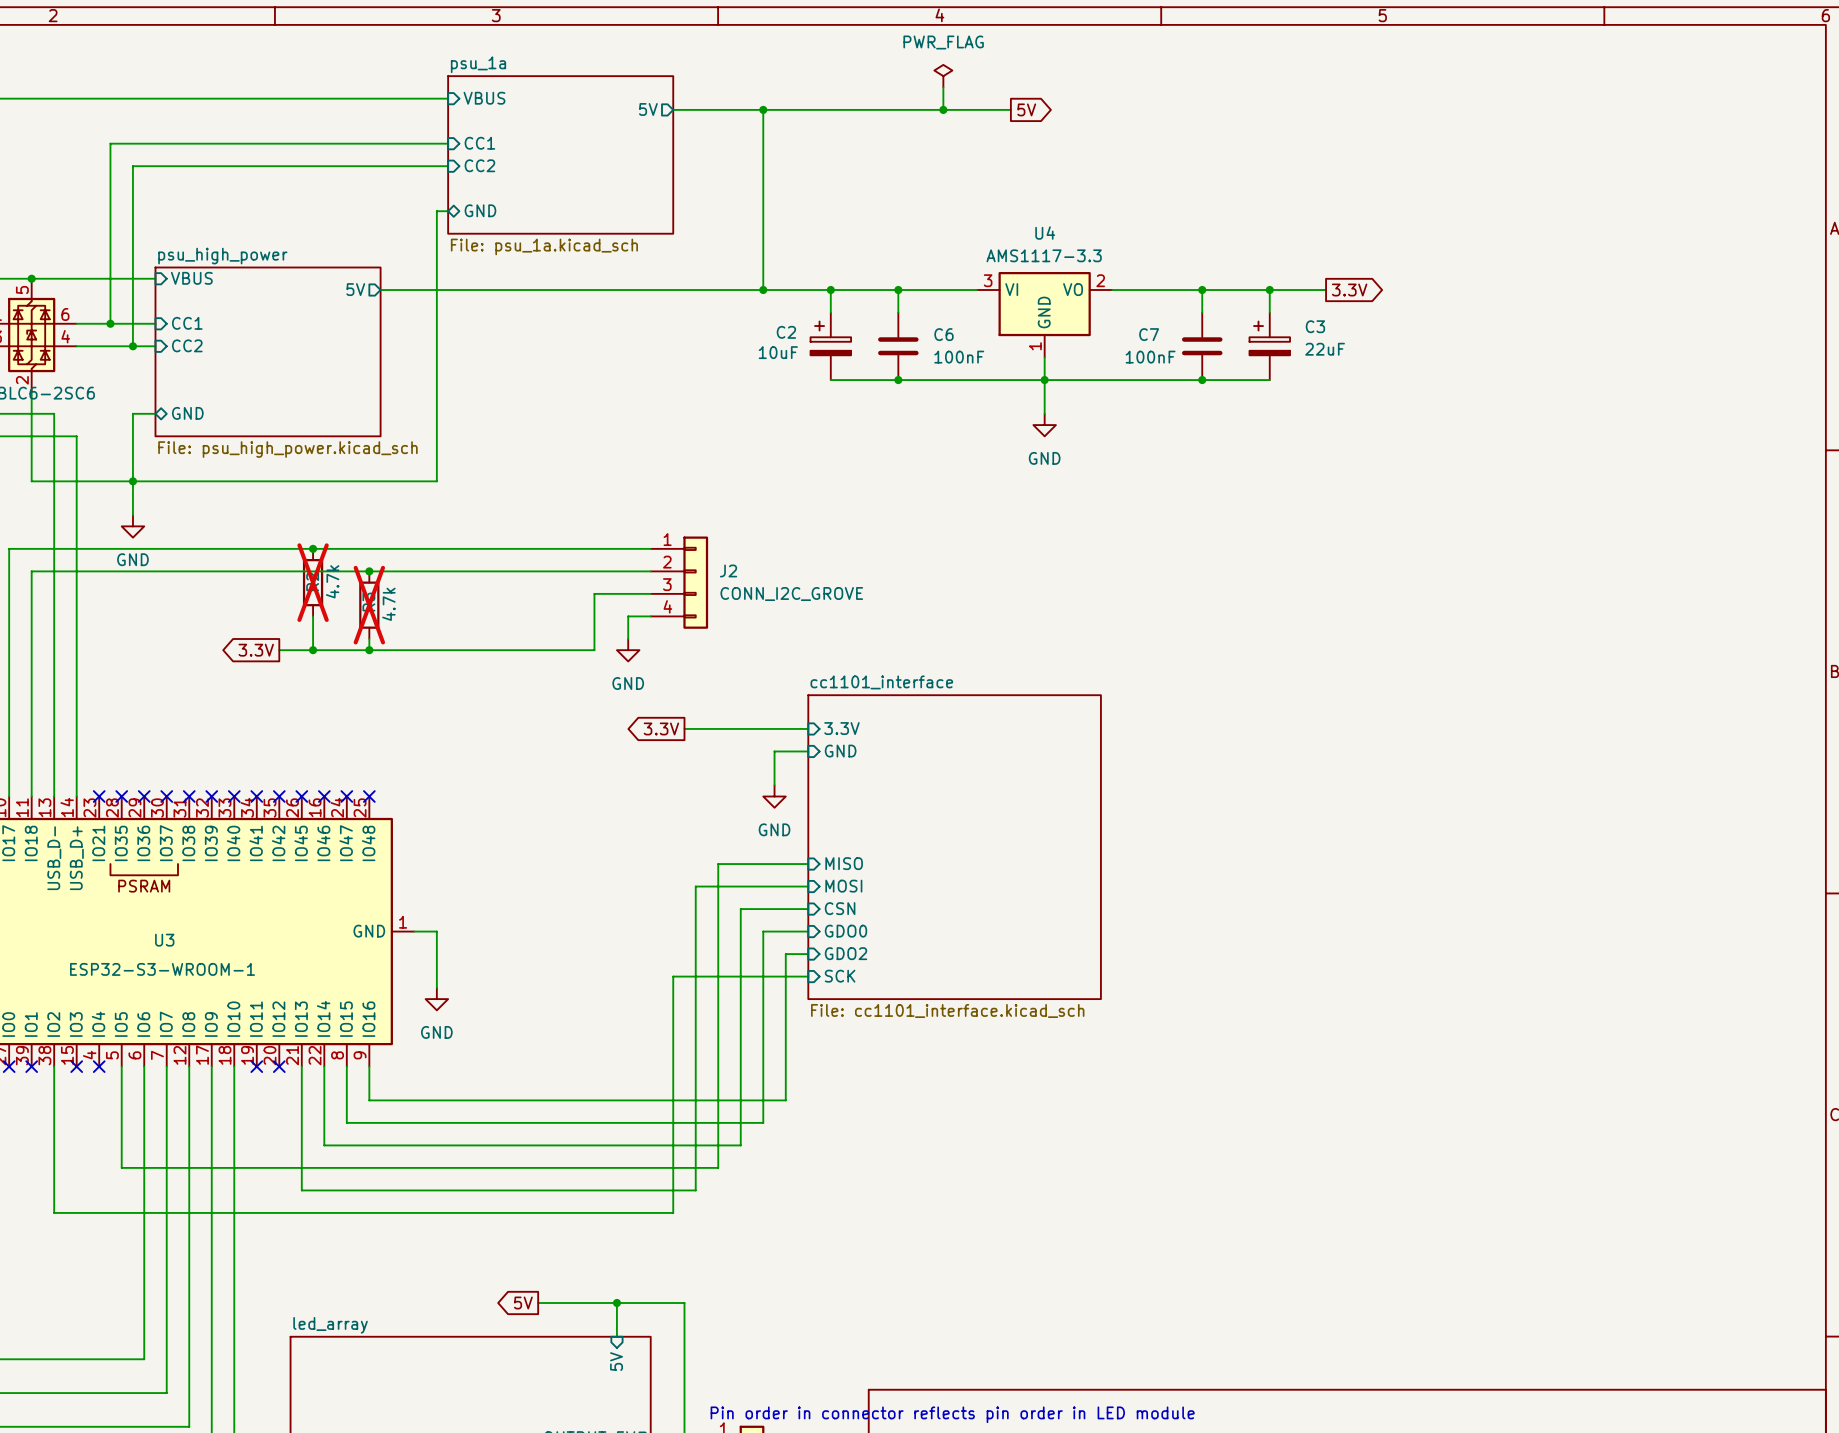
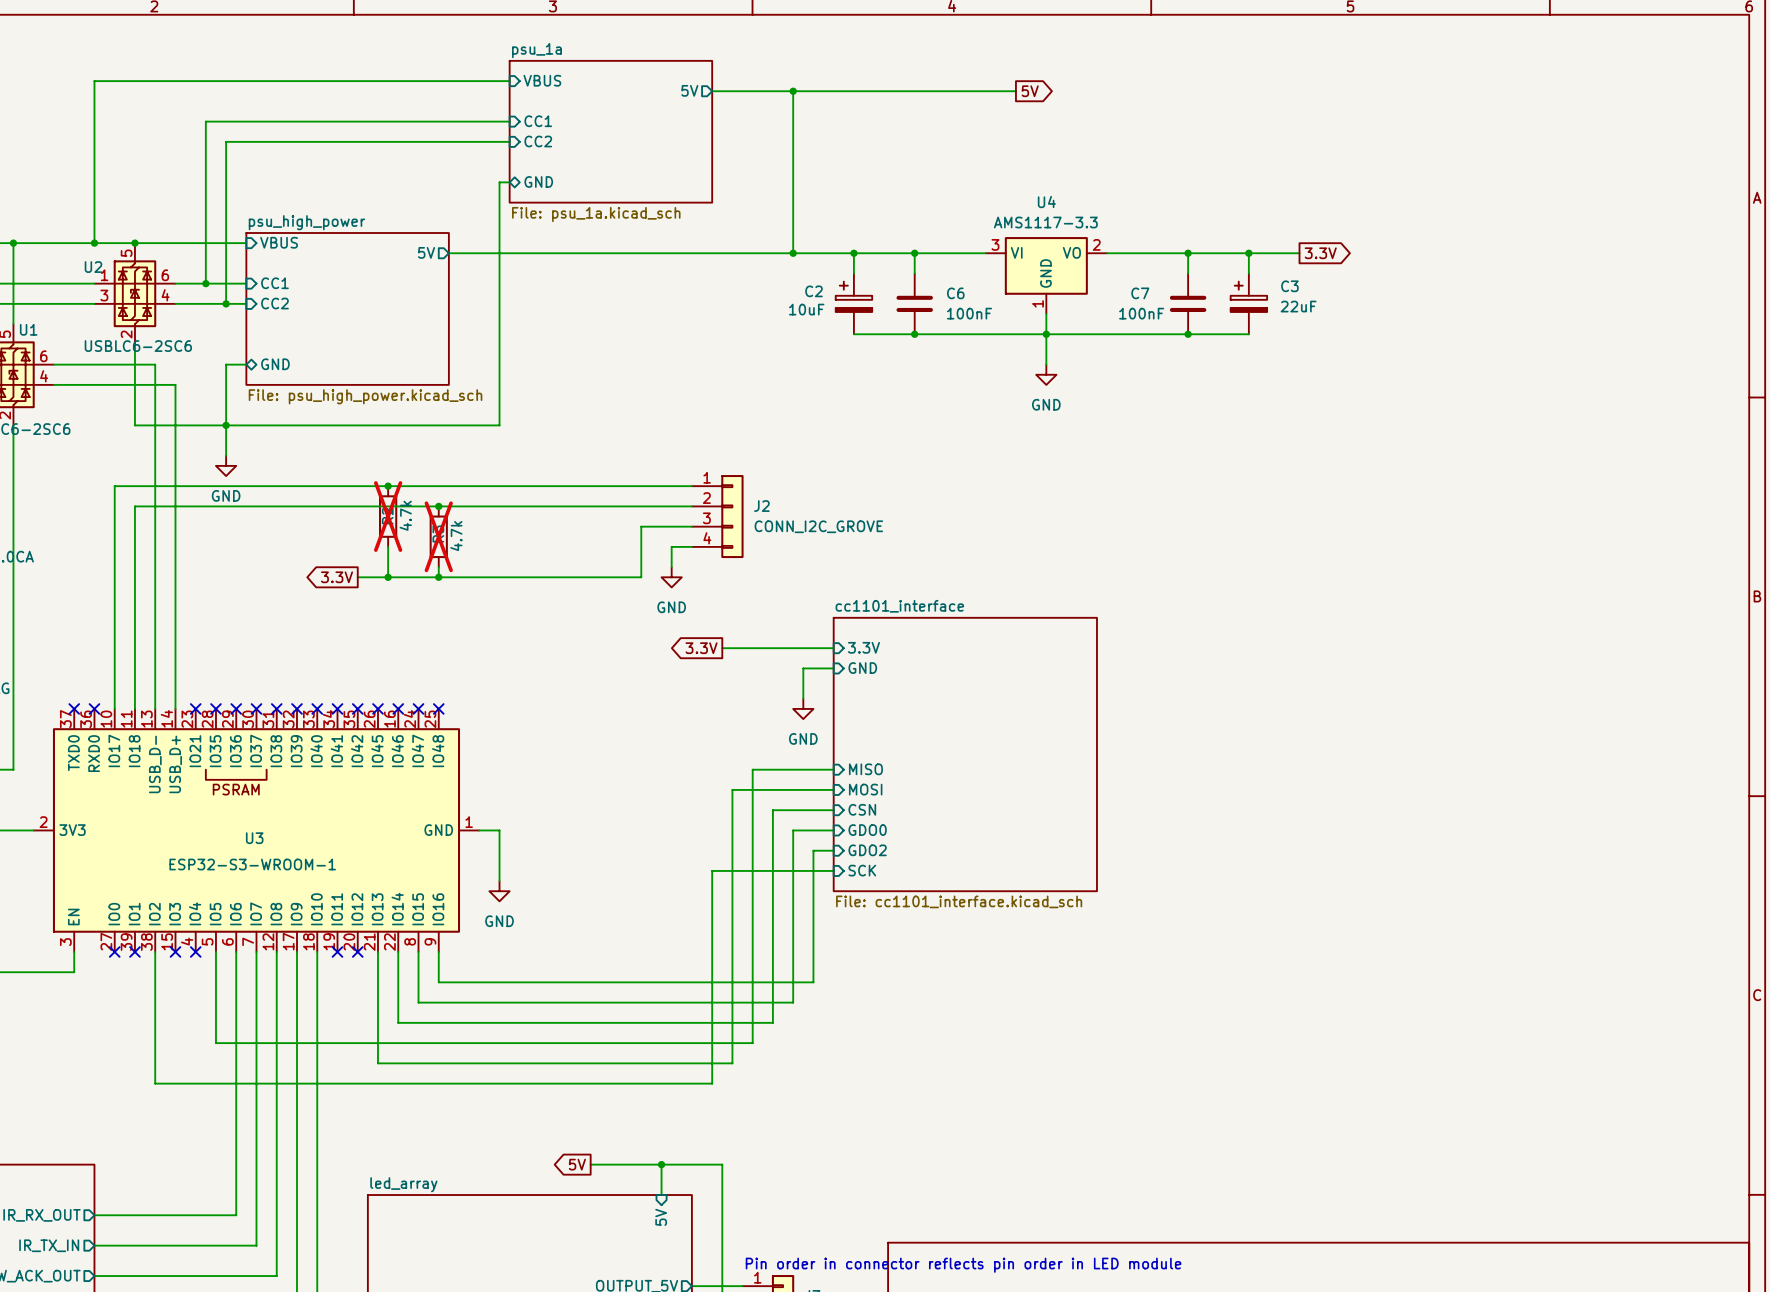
power symbol: PWR_FLAG (943, 76) -> none
wire: (943, 87) (943, 109) -> none
junction: (943, 109) -> none

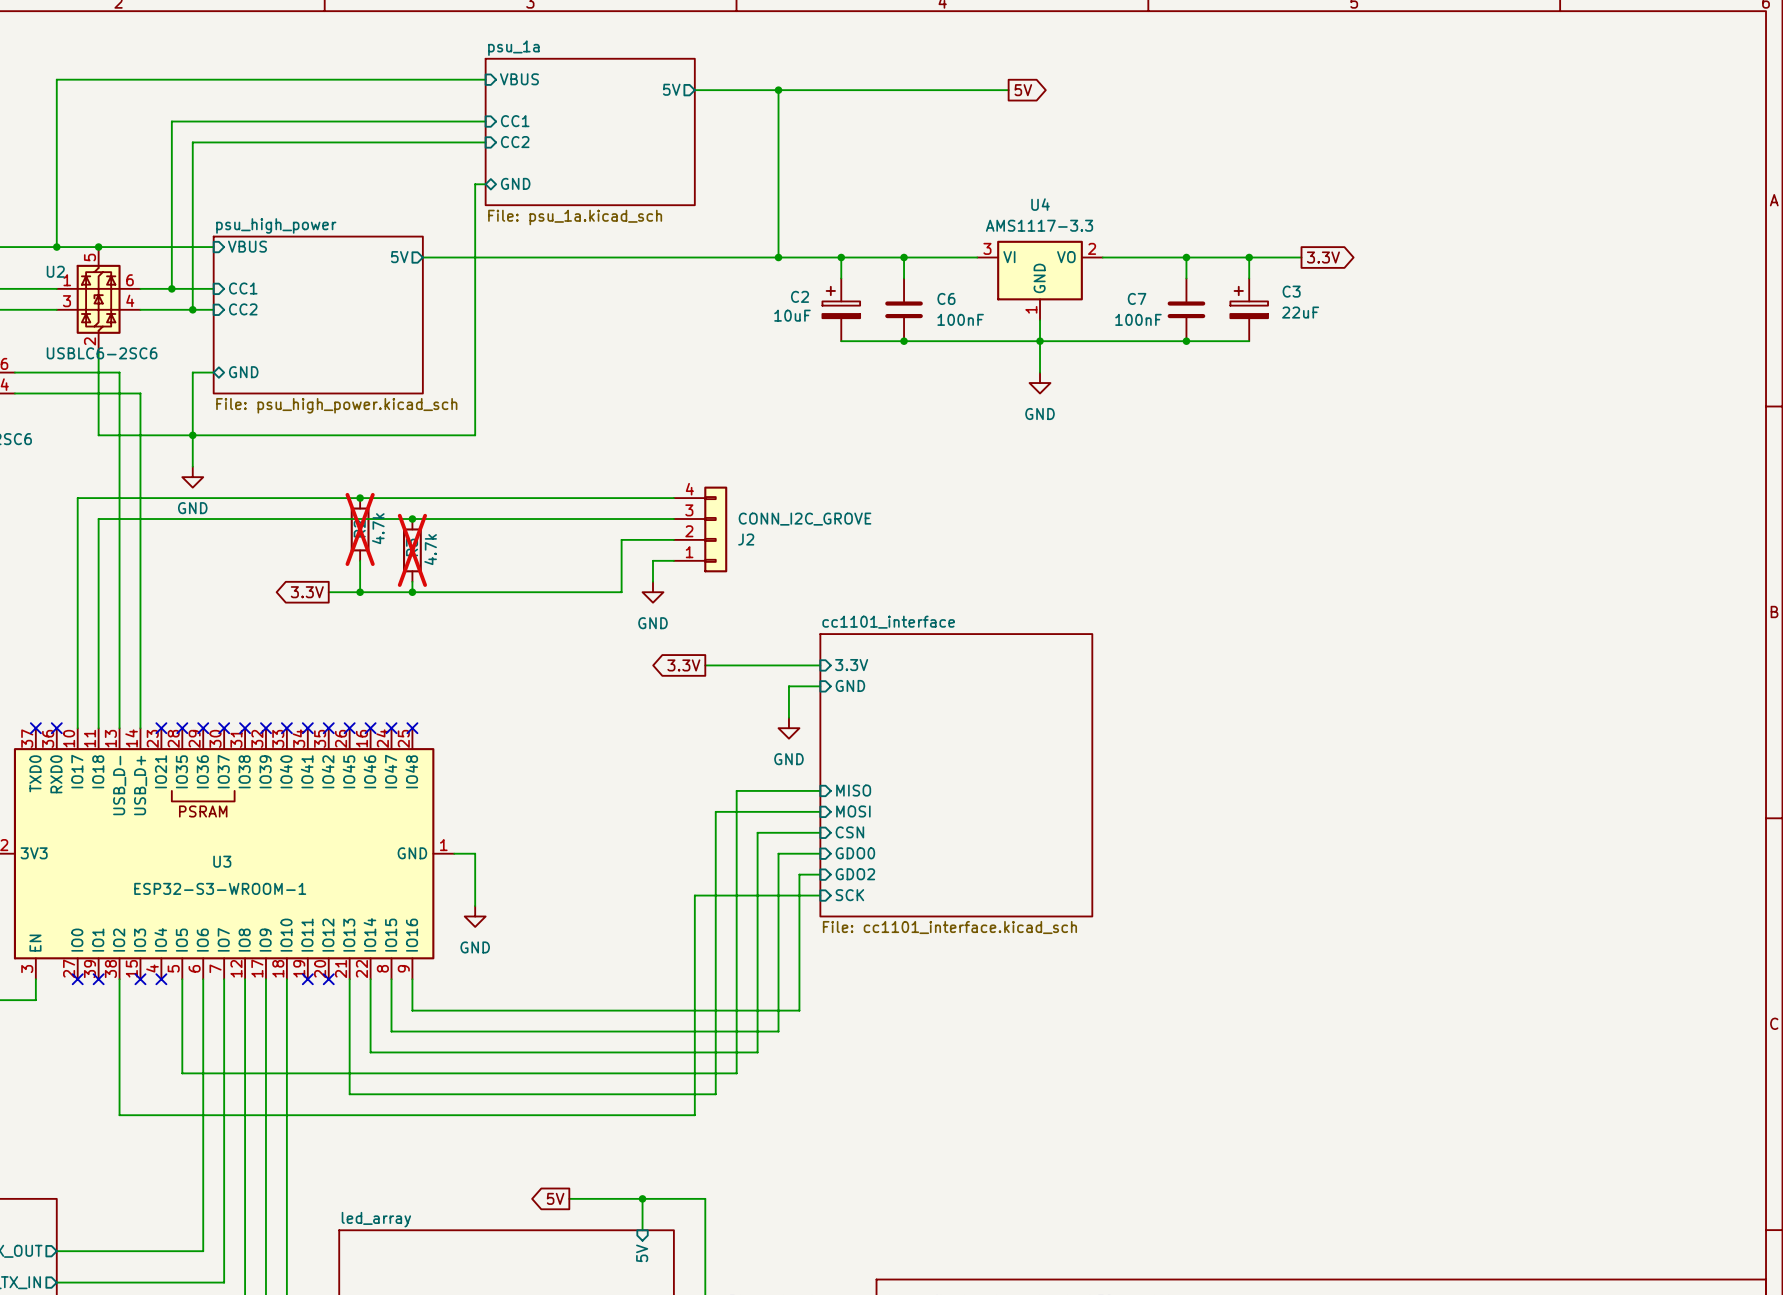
J2 flip: as is (732, 516) -> up-down (715, 529)

